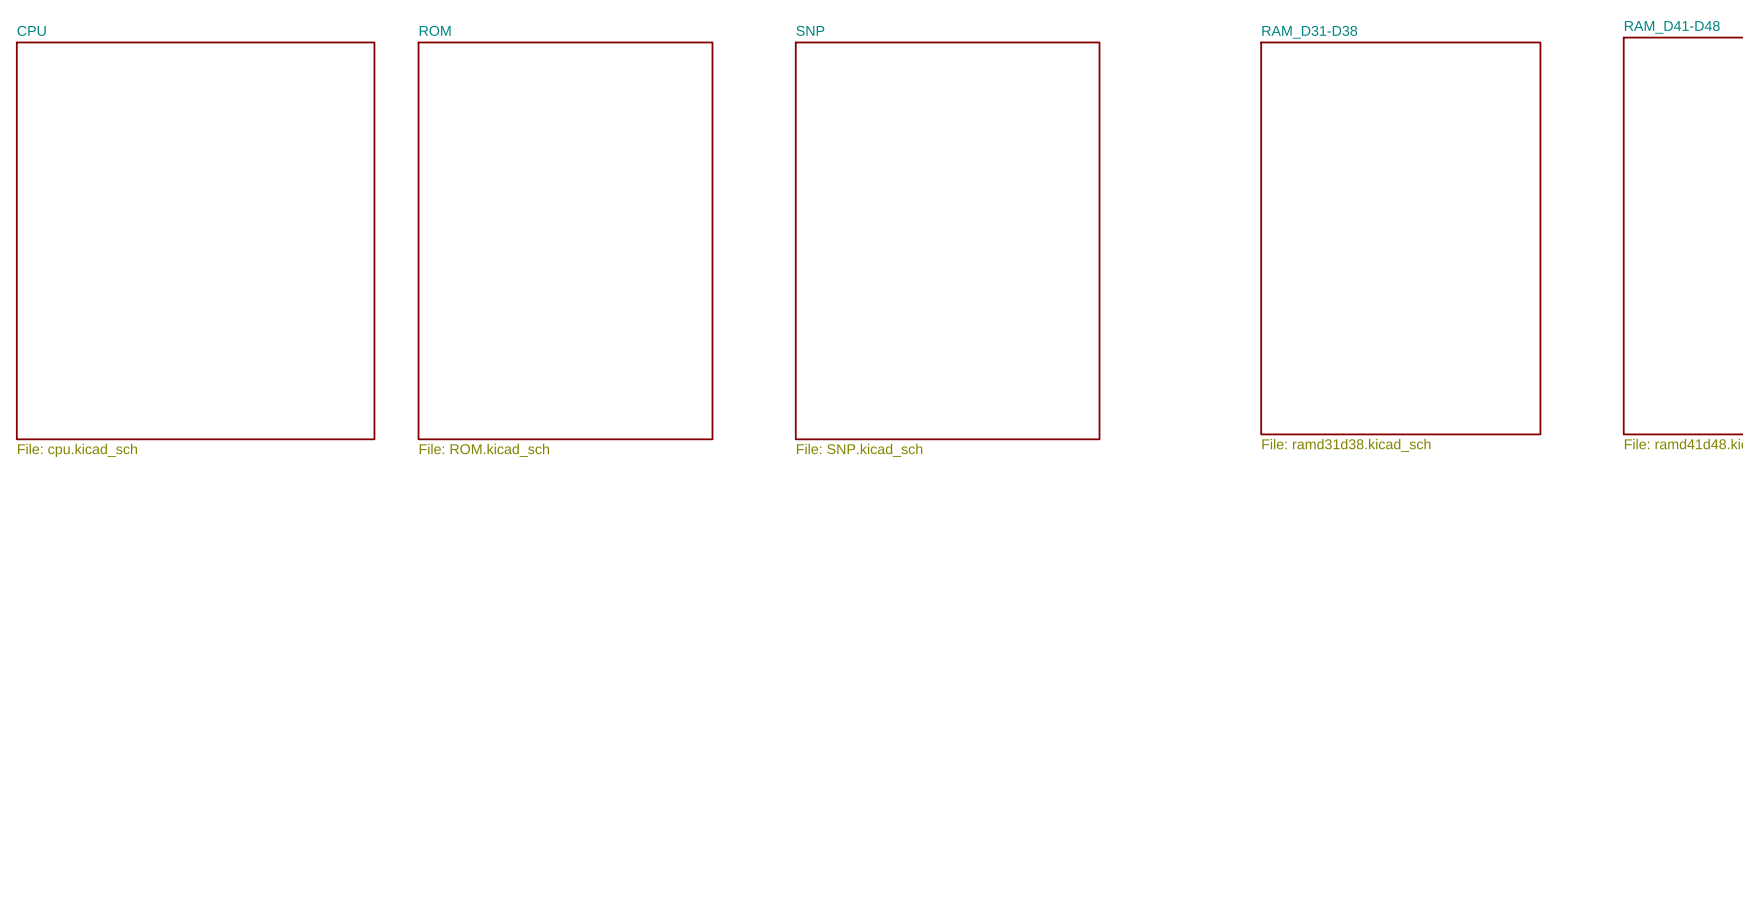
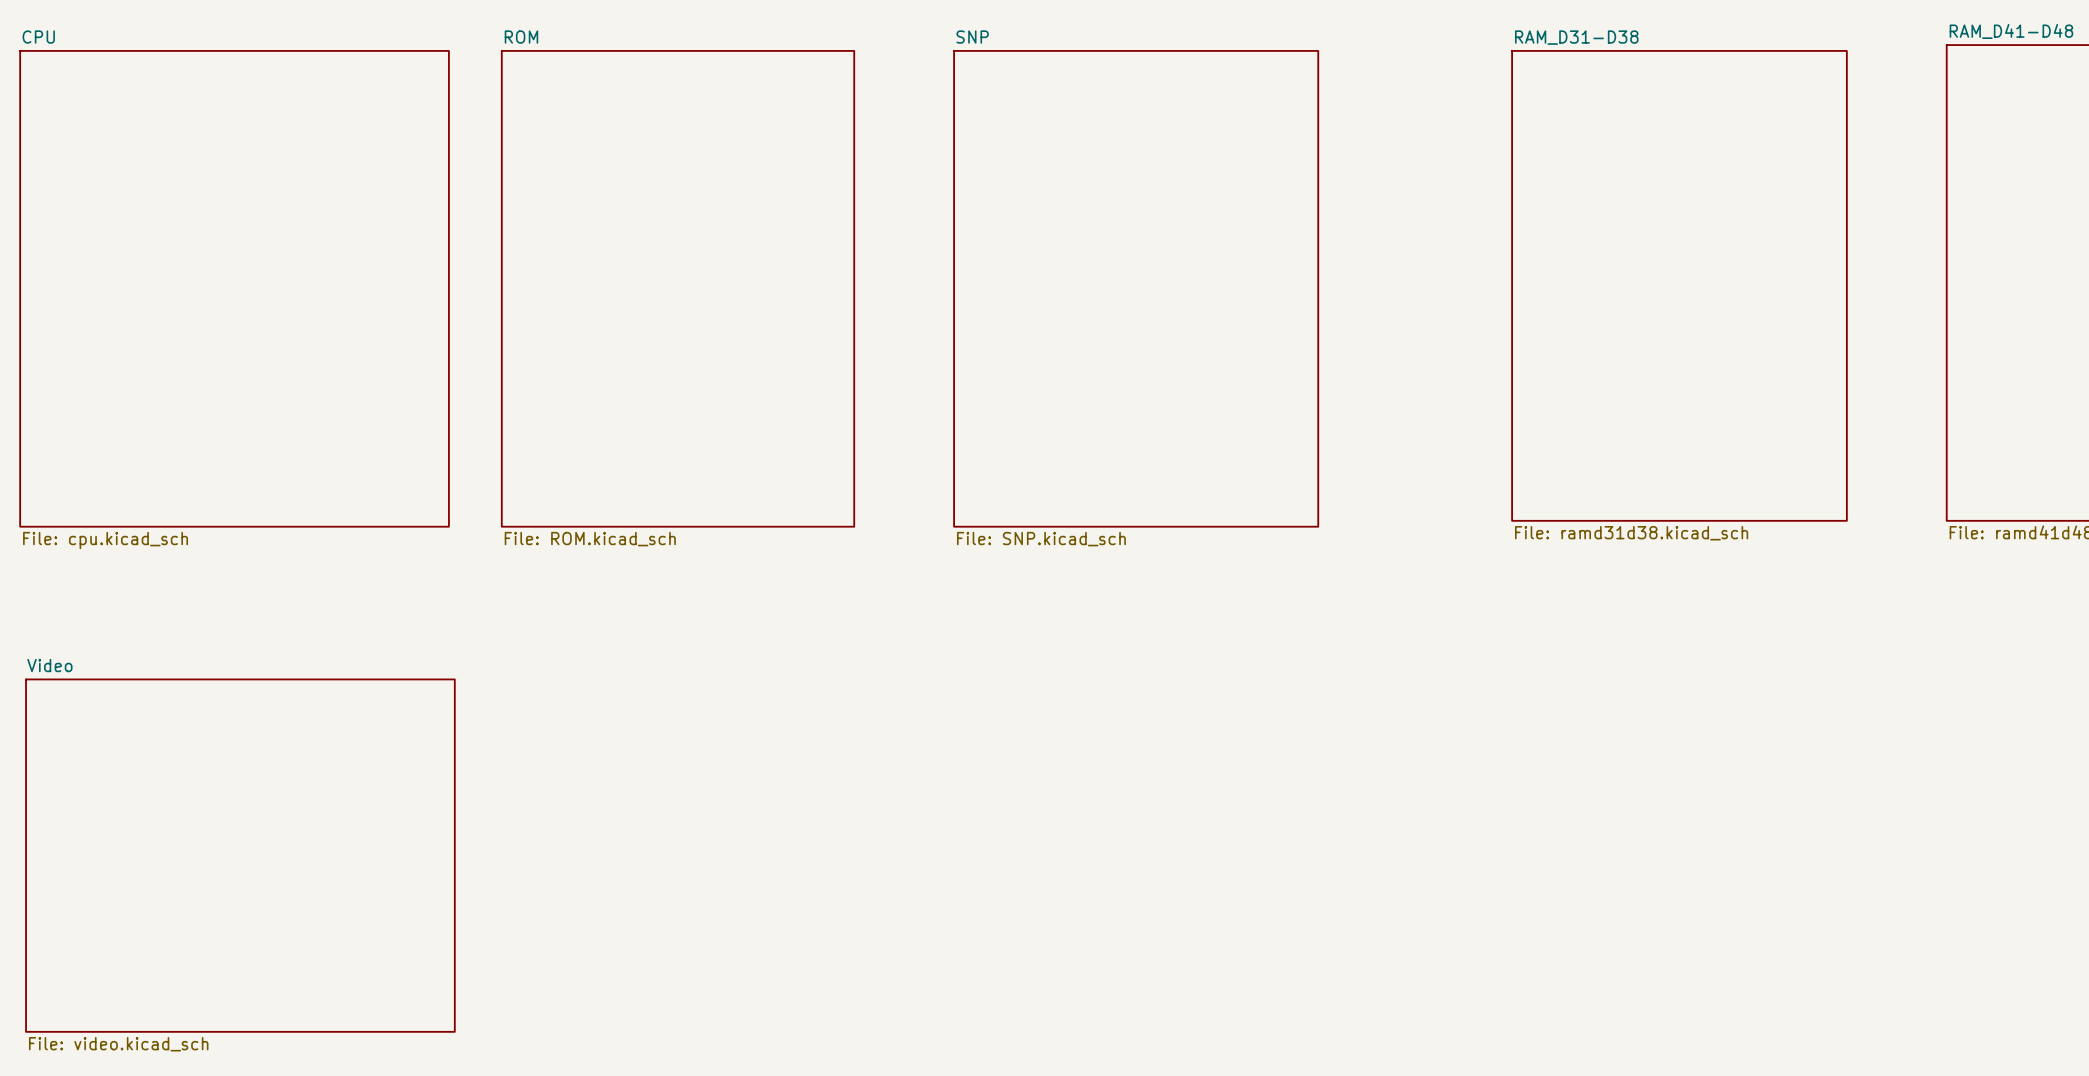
sheet Video: none -> File: video.kicad_sch (240, 855)

